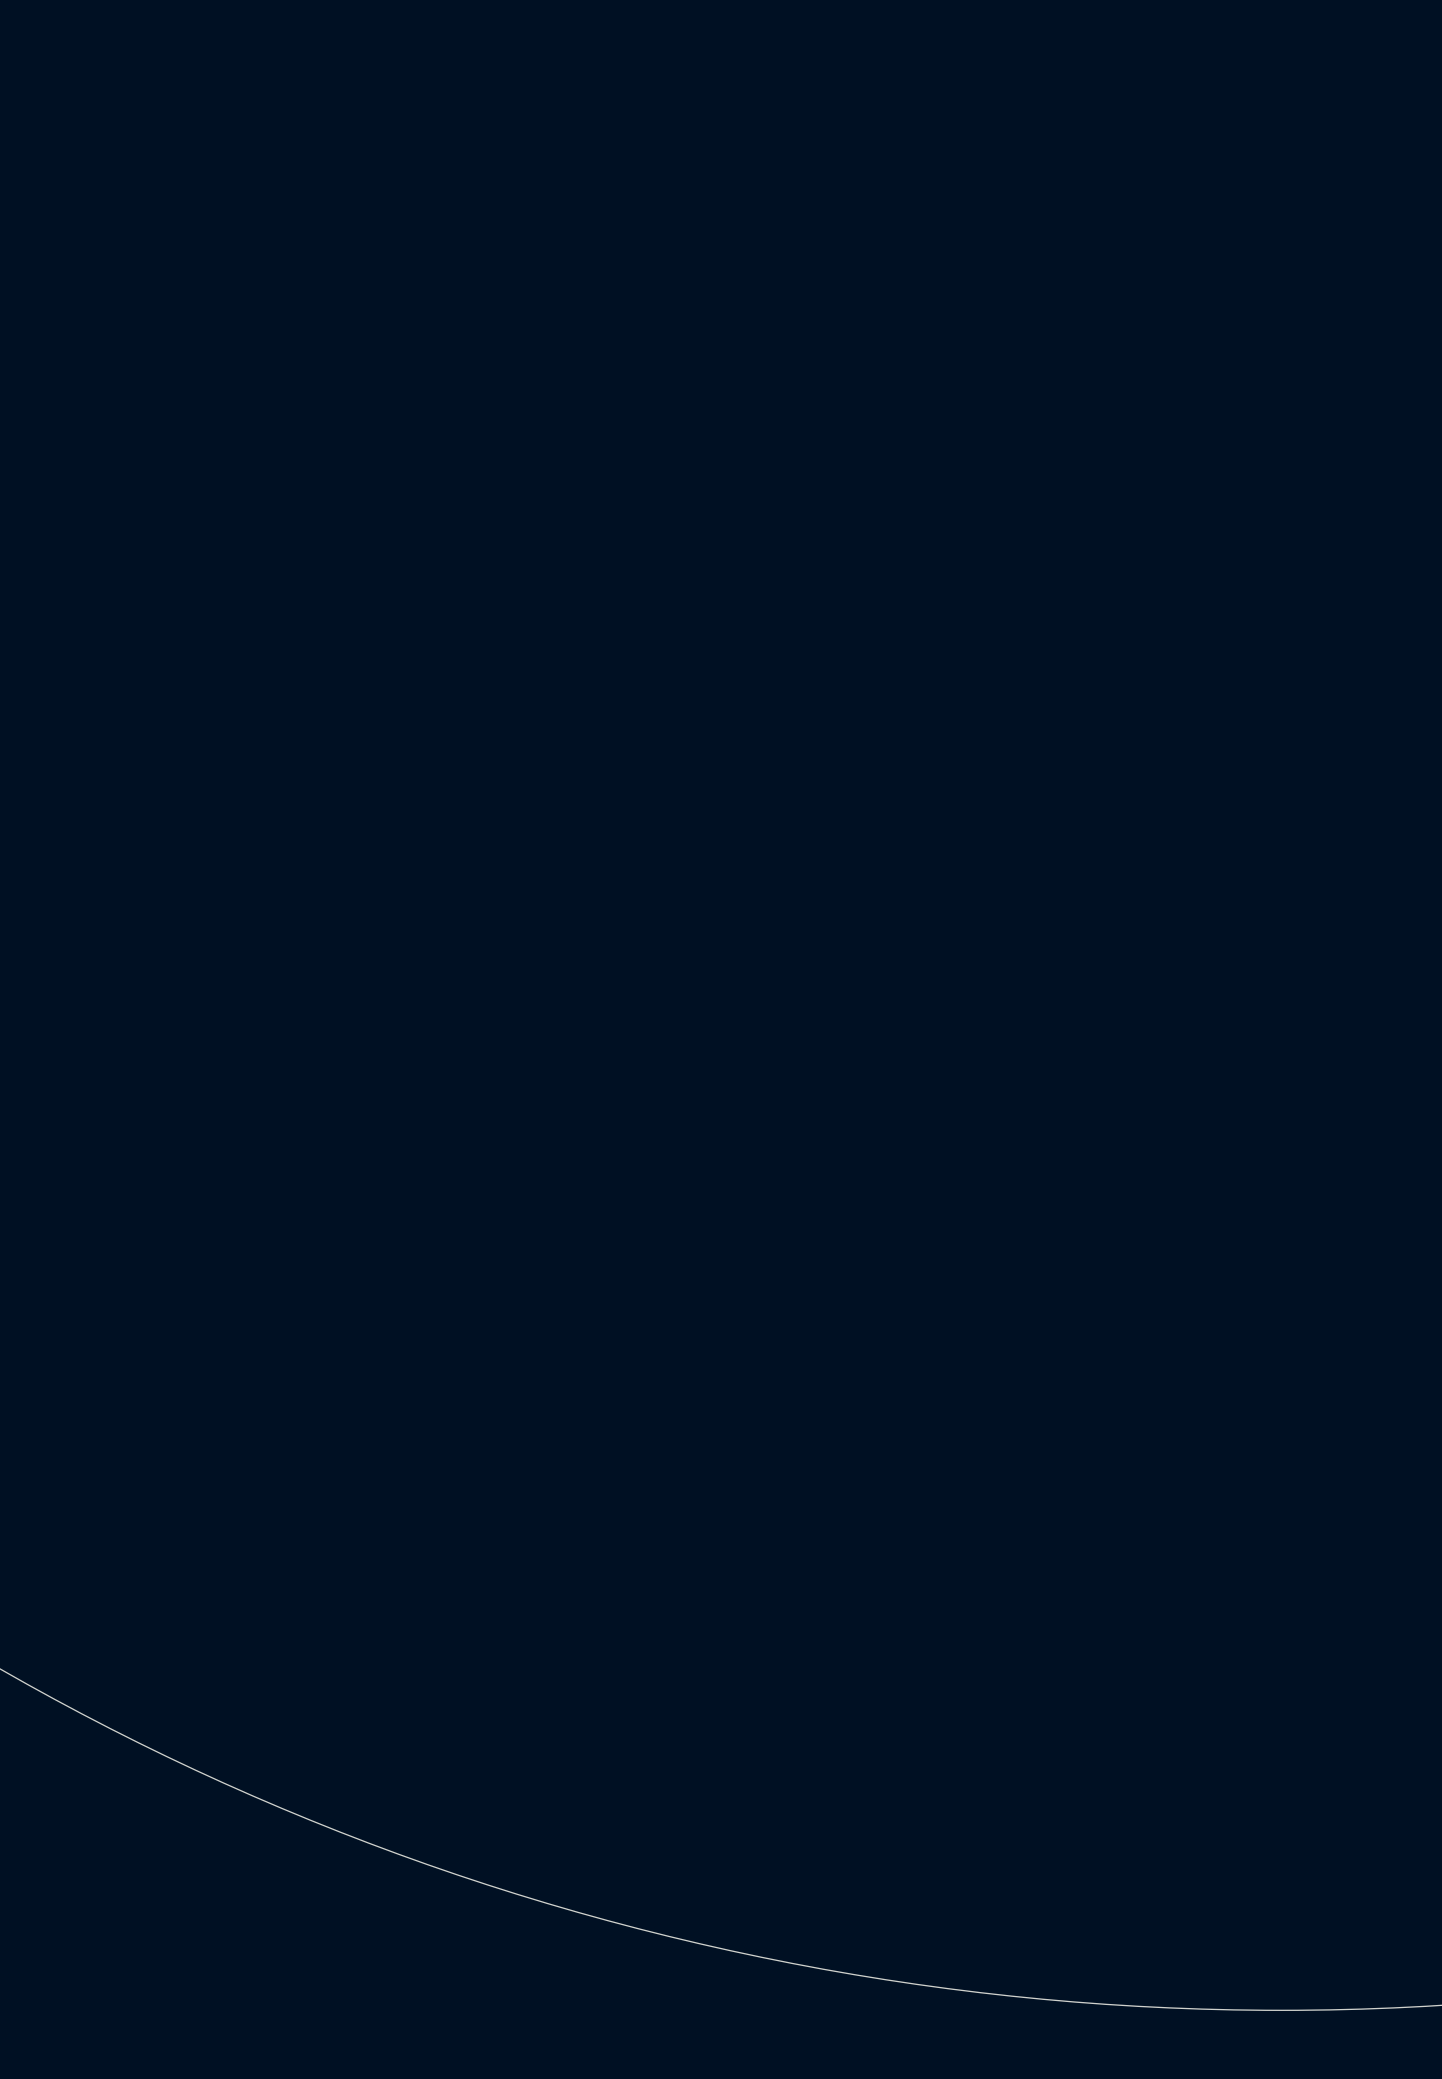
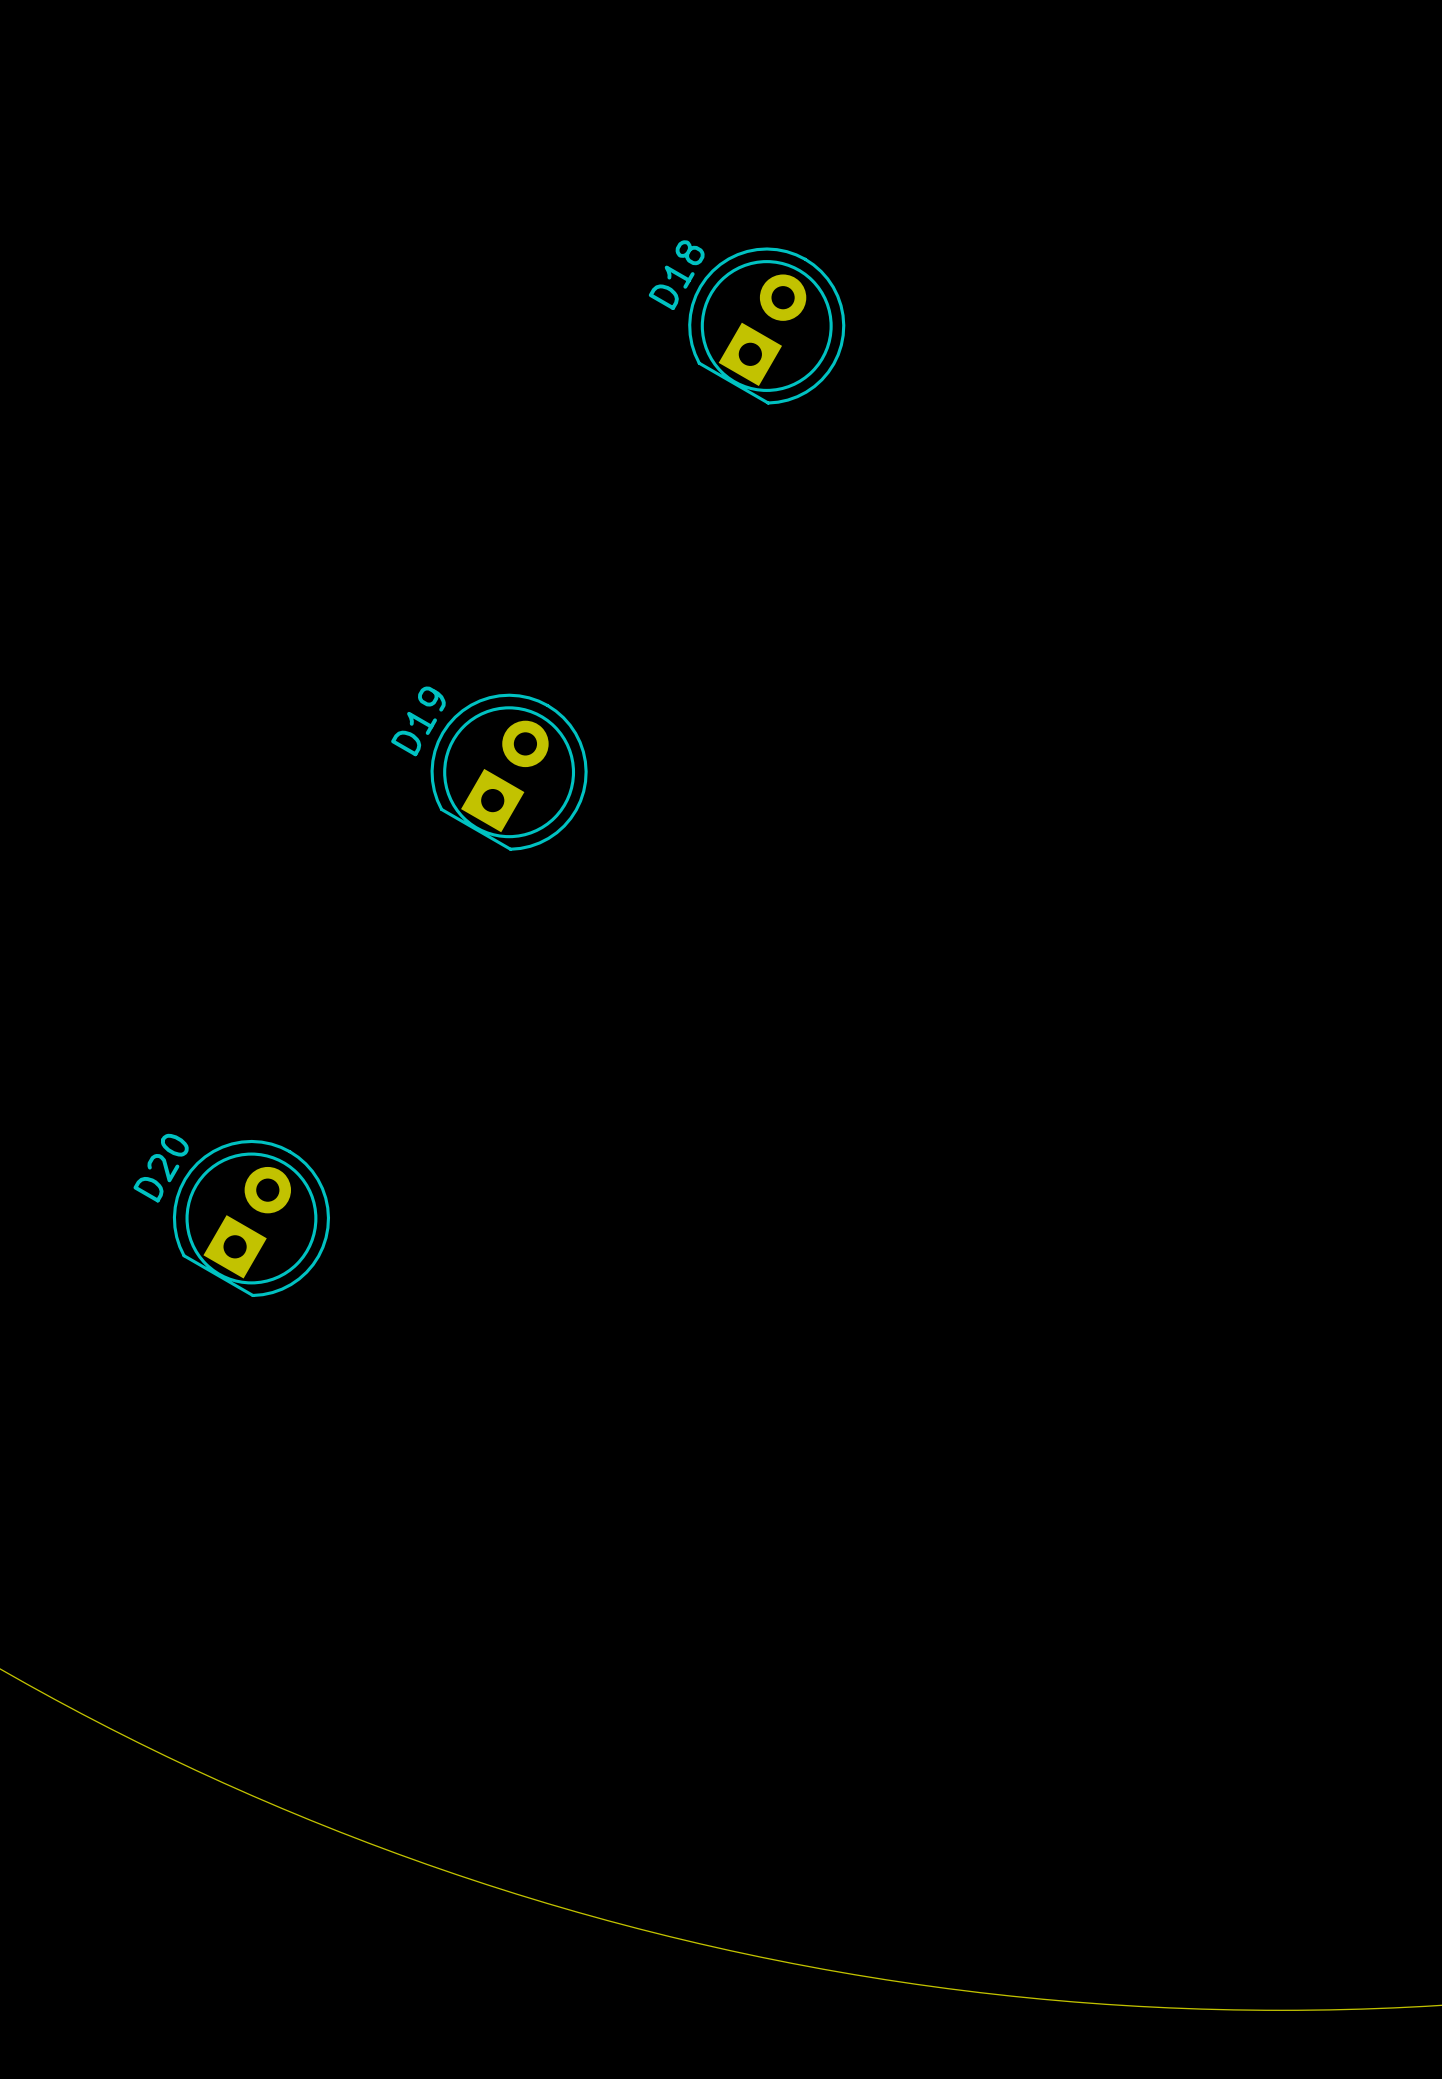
D18: none -> (766, 326)
D19: none -> (509, 772)
D20: none -> (251, 1218)

